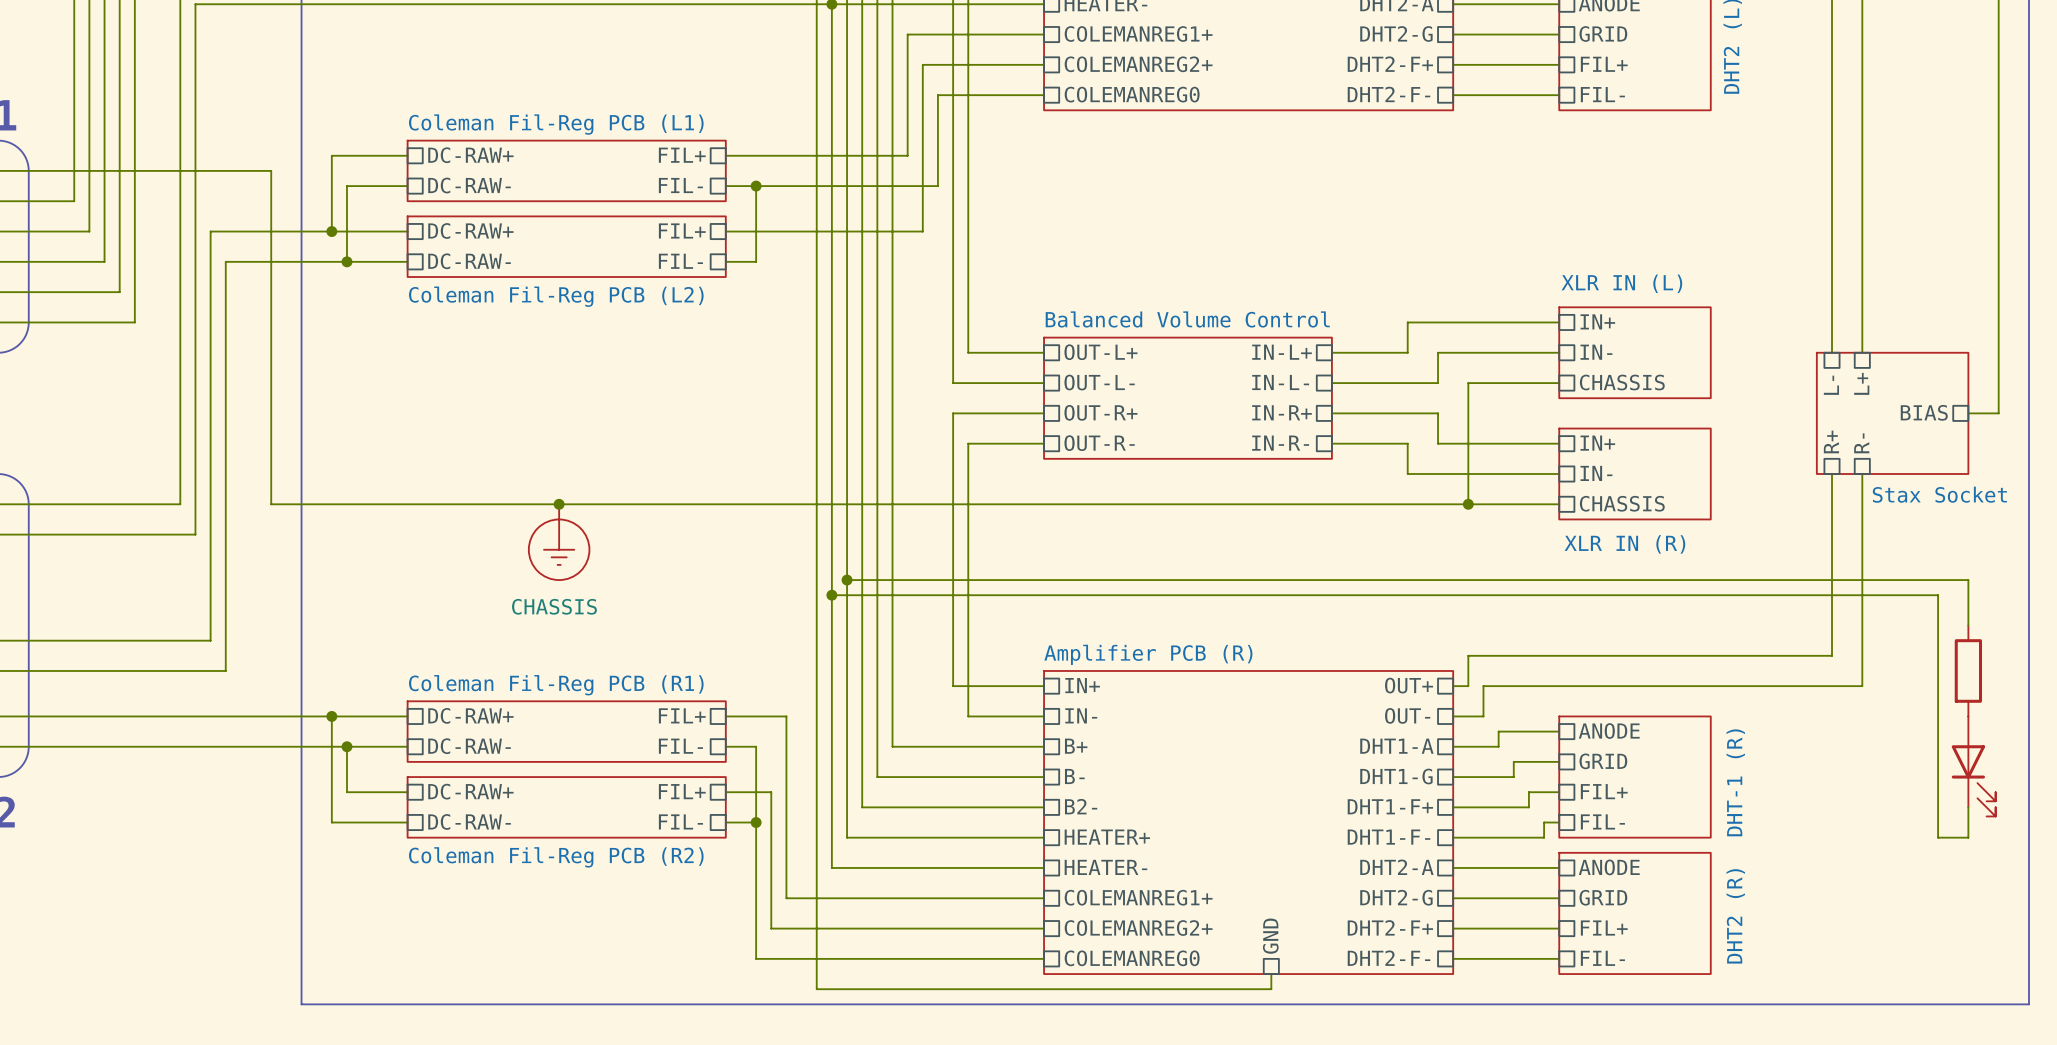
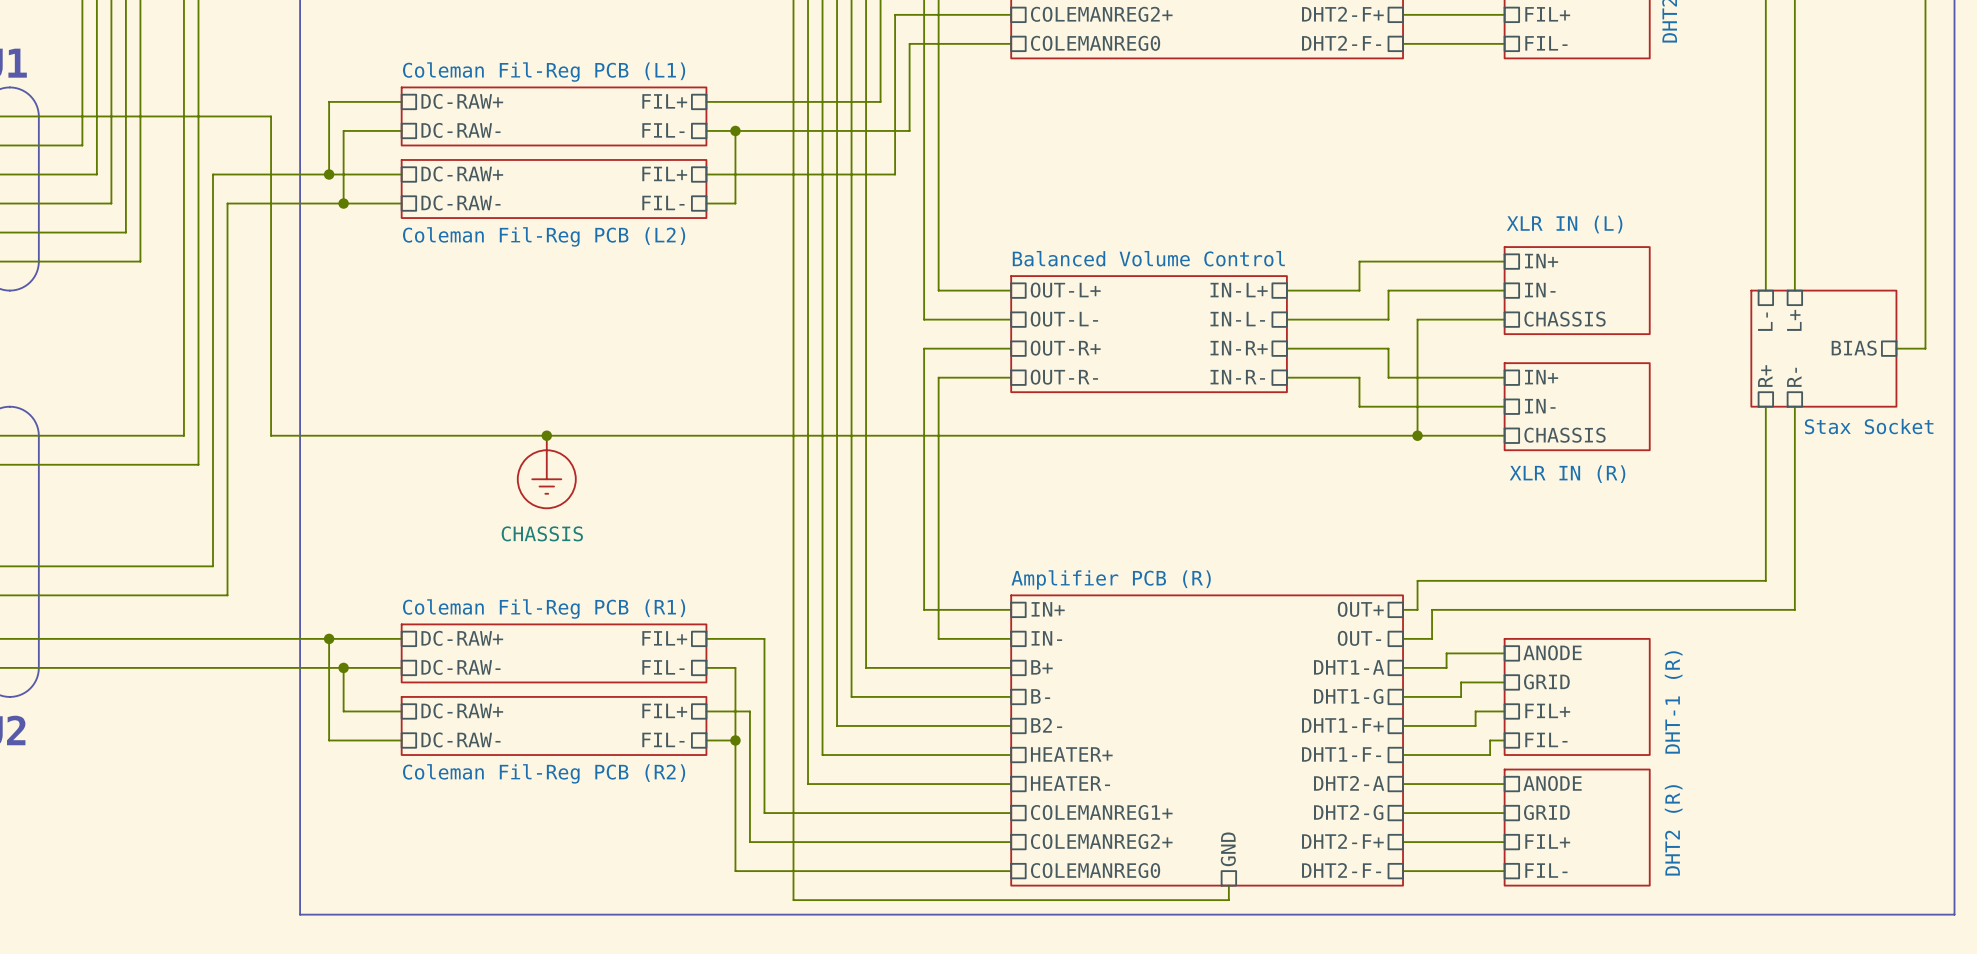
wire: (847, 580) (1968, 580) (1968, 625) -> none
junction: (847, 580) -> none
wire: (831, 595) (1938, 595) (1938, 837) (1968, 837) (1968, 807) -> none
junction: (831, 595) -> none
part: (1968, 670) -> none
part: (1973, 766) -> none

